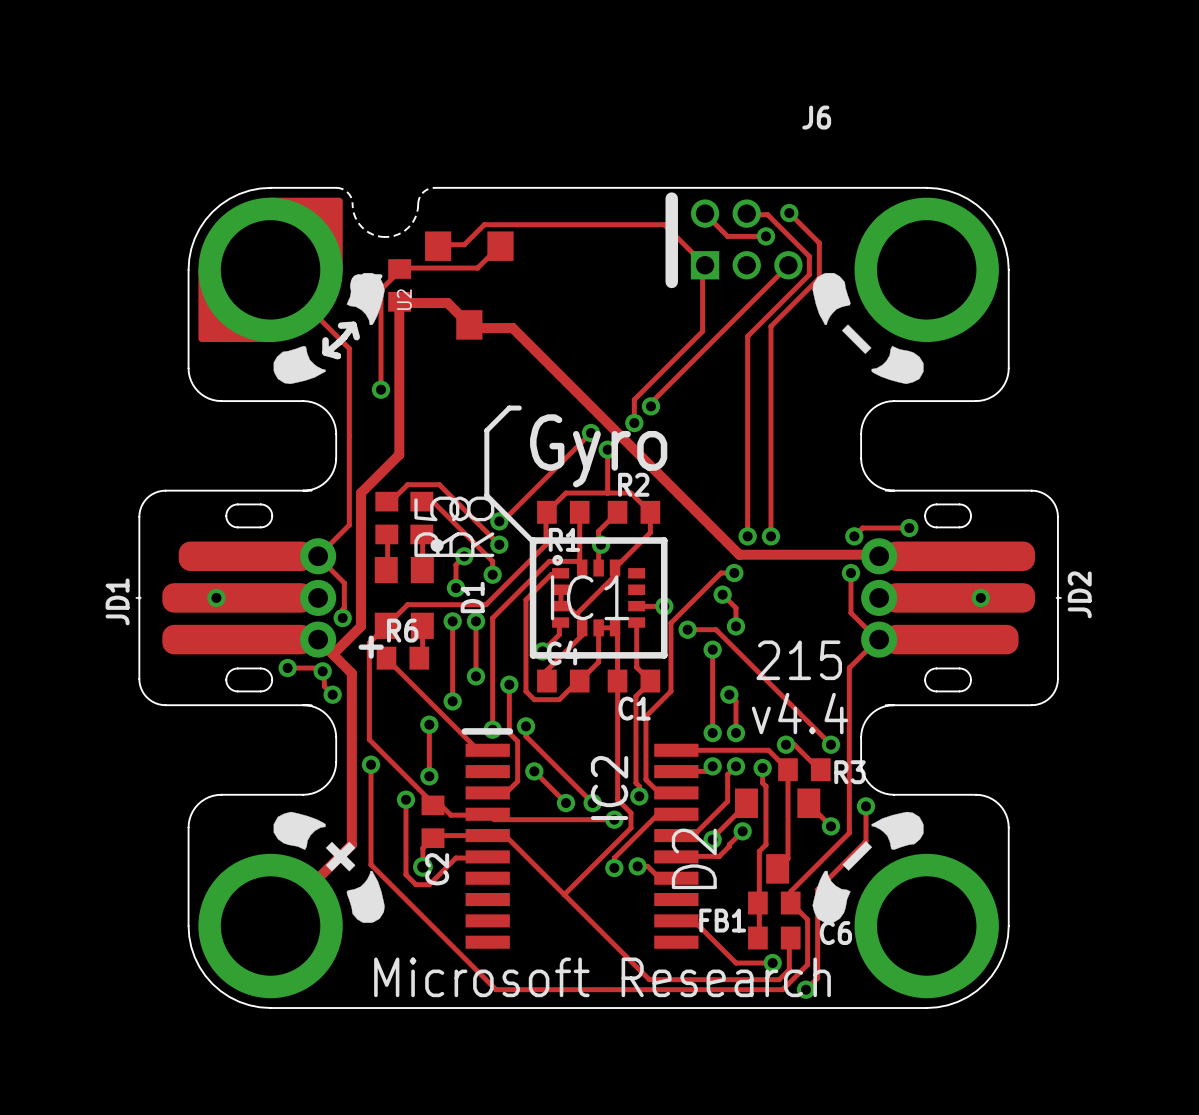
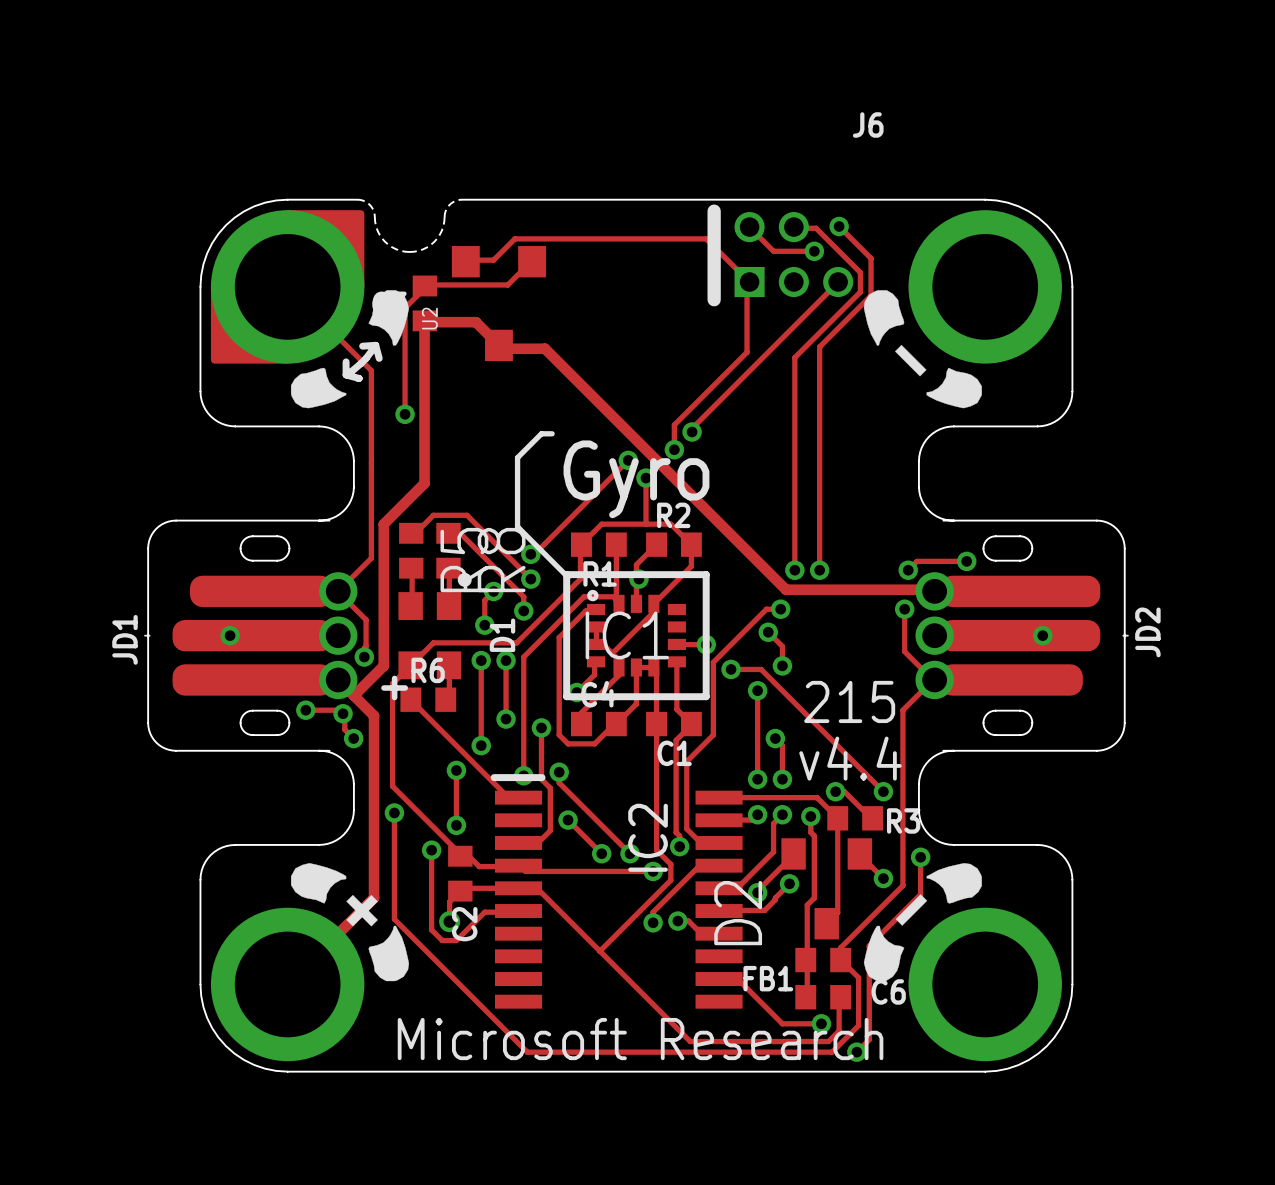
board edge: (188, 368) (191, 380) (195, 388) (201, 394) (212, 399) (303, 401) (319, 405) (329, 413) (335, 425) (336, 458) -> none
board edge: (1008, 368) (1006, 380) (1001, 388) (995, 394) (984, 399) (893, 401) (877, 405) (867, 413) (862, 425) (861, 458) -> none
JD1 footprint: [136, 458, 337, 738] -> [144, 391, 358, 881]
JD2 footprint: [860, 458, 1062, 738] -> [915, 391, 1129, 881]
board edge: (336, 737) (335, 770) (329, 781) (319, 790) (303, 794) (212, 795) (201, 801) (195, 807) (191, 815) (188, 827) -> none
board edge: (861, 737) (862, 770) (867, 781) (877, 790) (893, 794) (984, 795) (995, 801) (1001, 807) (1006, 815) (1008, 827) -> none

